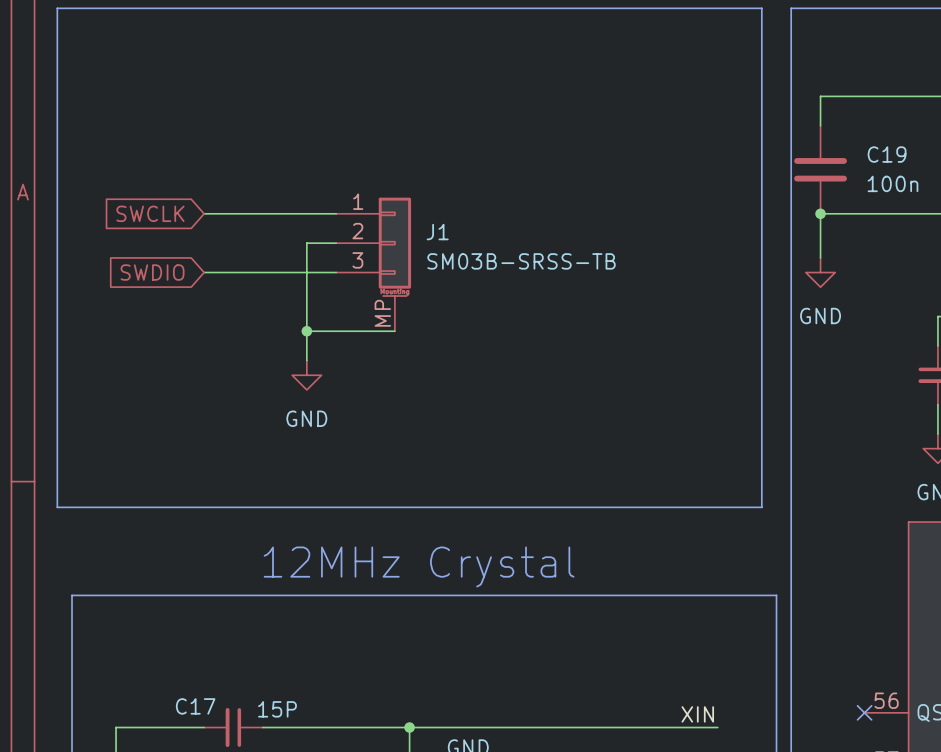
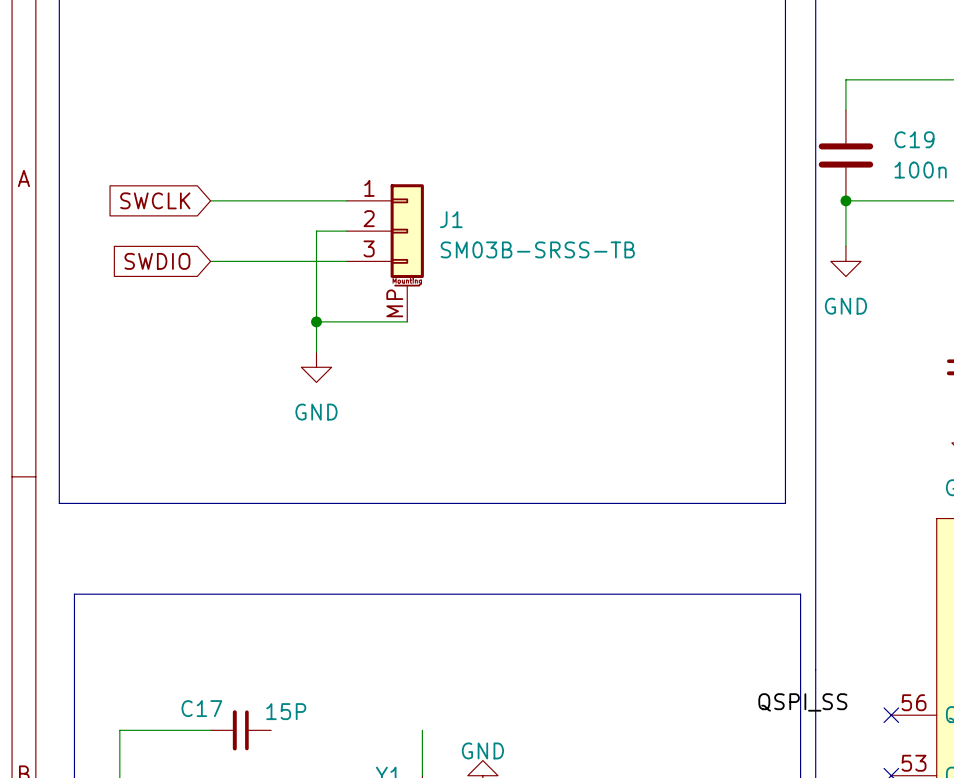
text: 12MHz Crystal (419, 566) -> none
label: none -> QSPI_SS (802, 702)
label: XIN (697, 714) -> none
wire: (262, 727) (717, 727) -> none
junction: (409, 727) -> none

